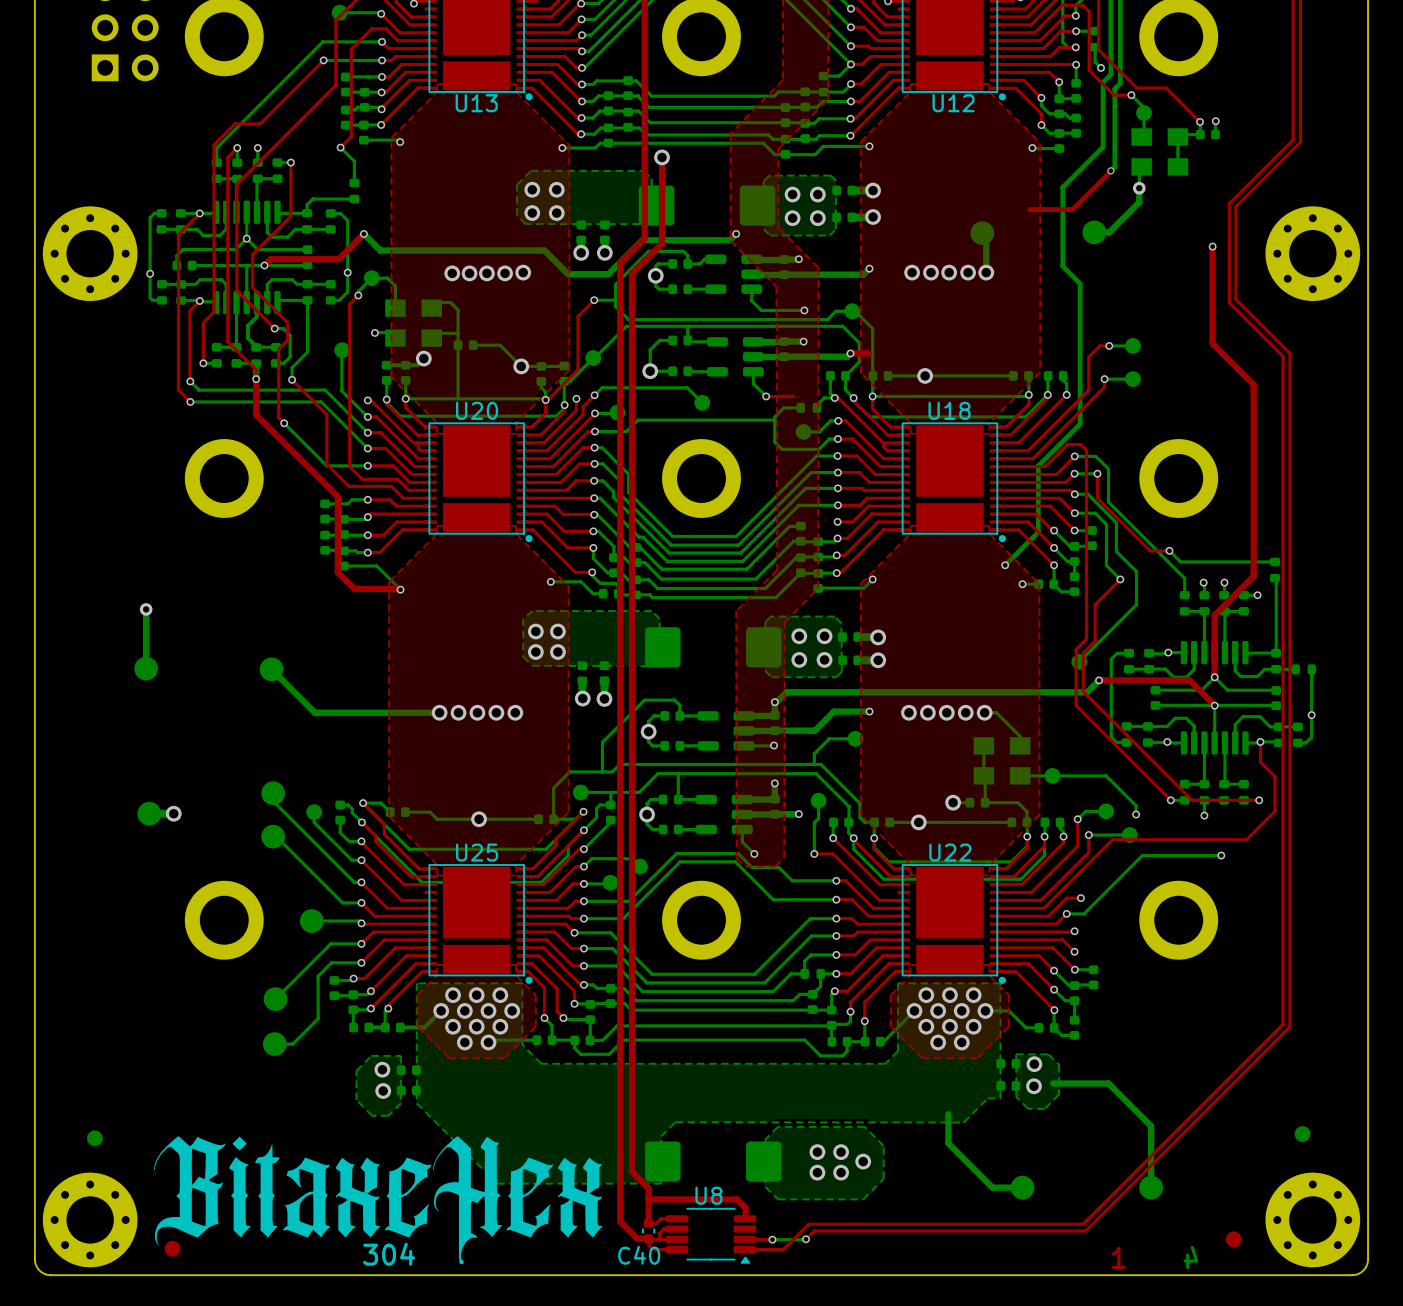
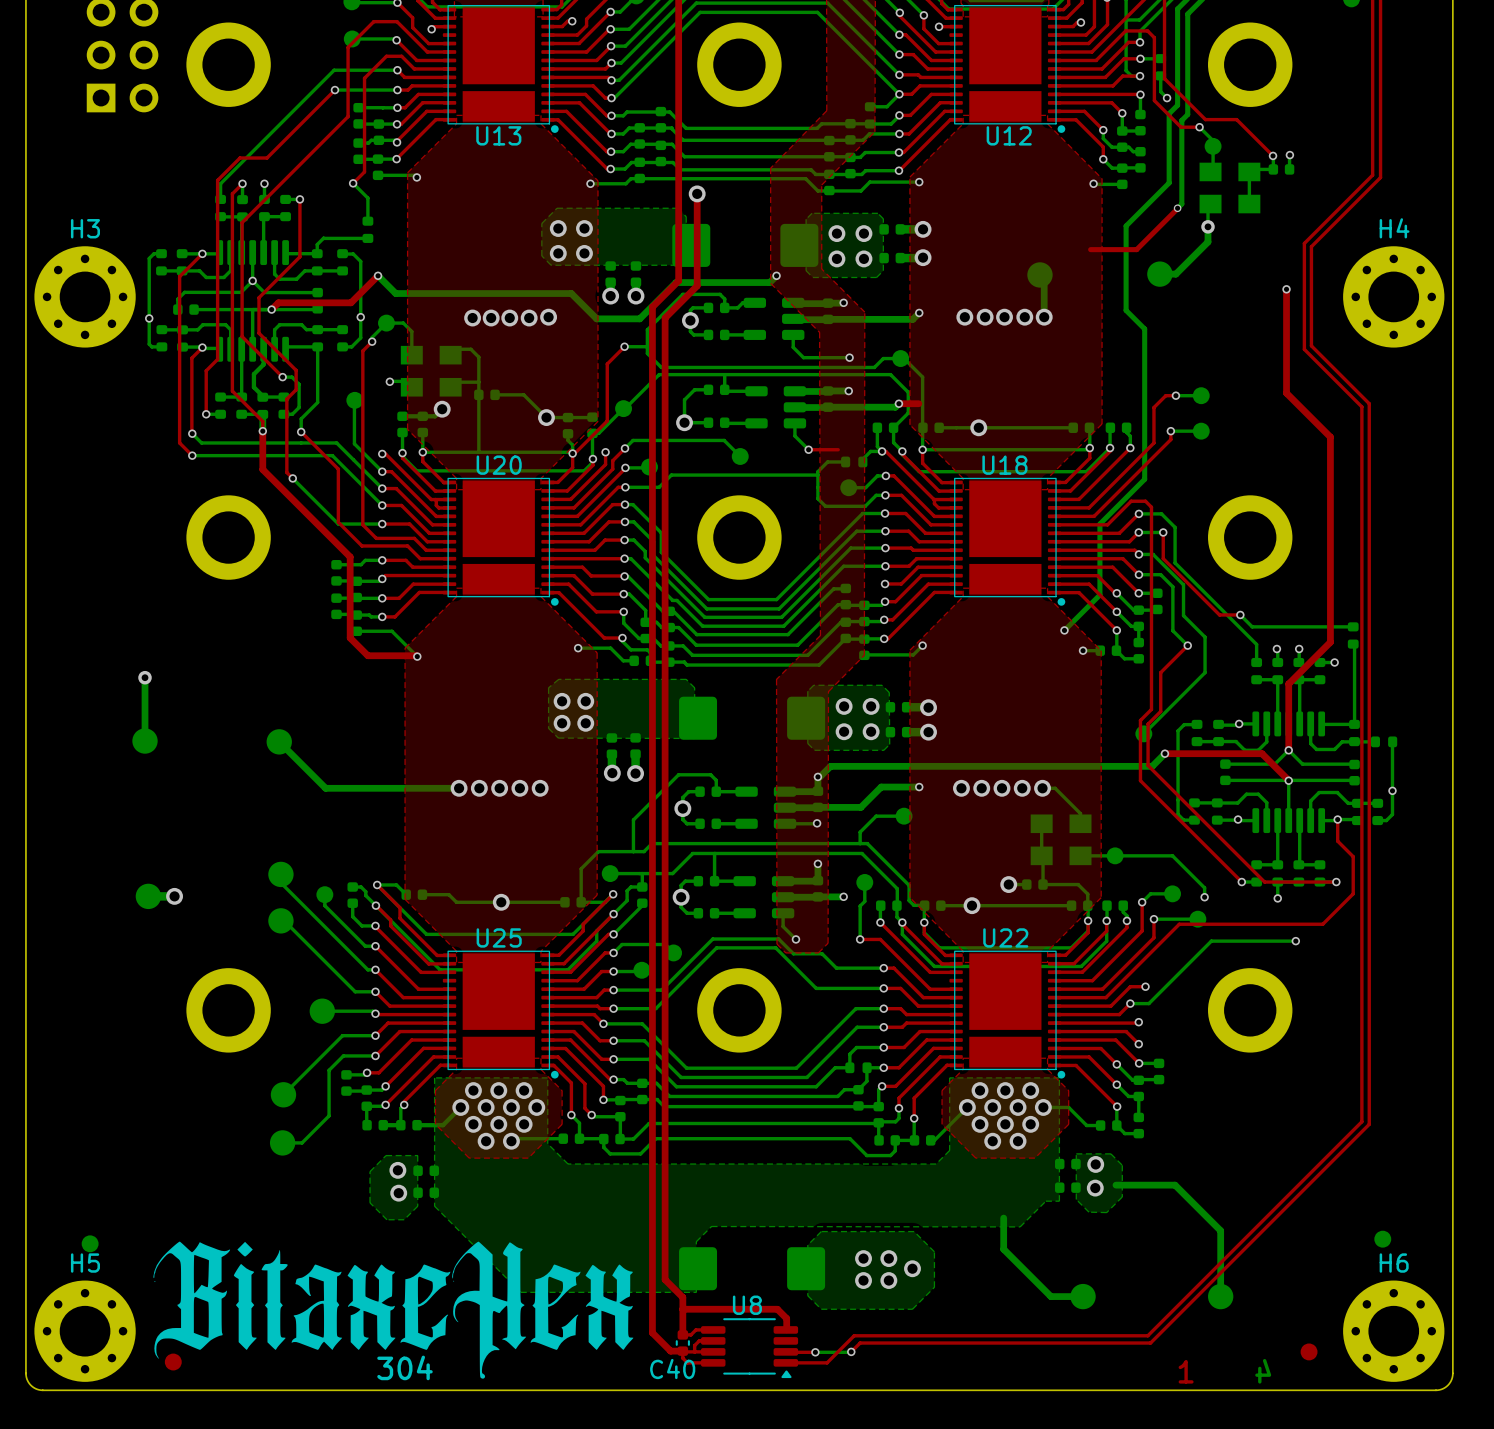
H3 name: none -> H3 (85, 228)
H4 name: none -> H4 (1394, 228)
H5 name: none -> H5 (85, 1263)
H6 name: none -> H6 (1394, 1263)

